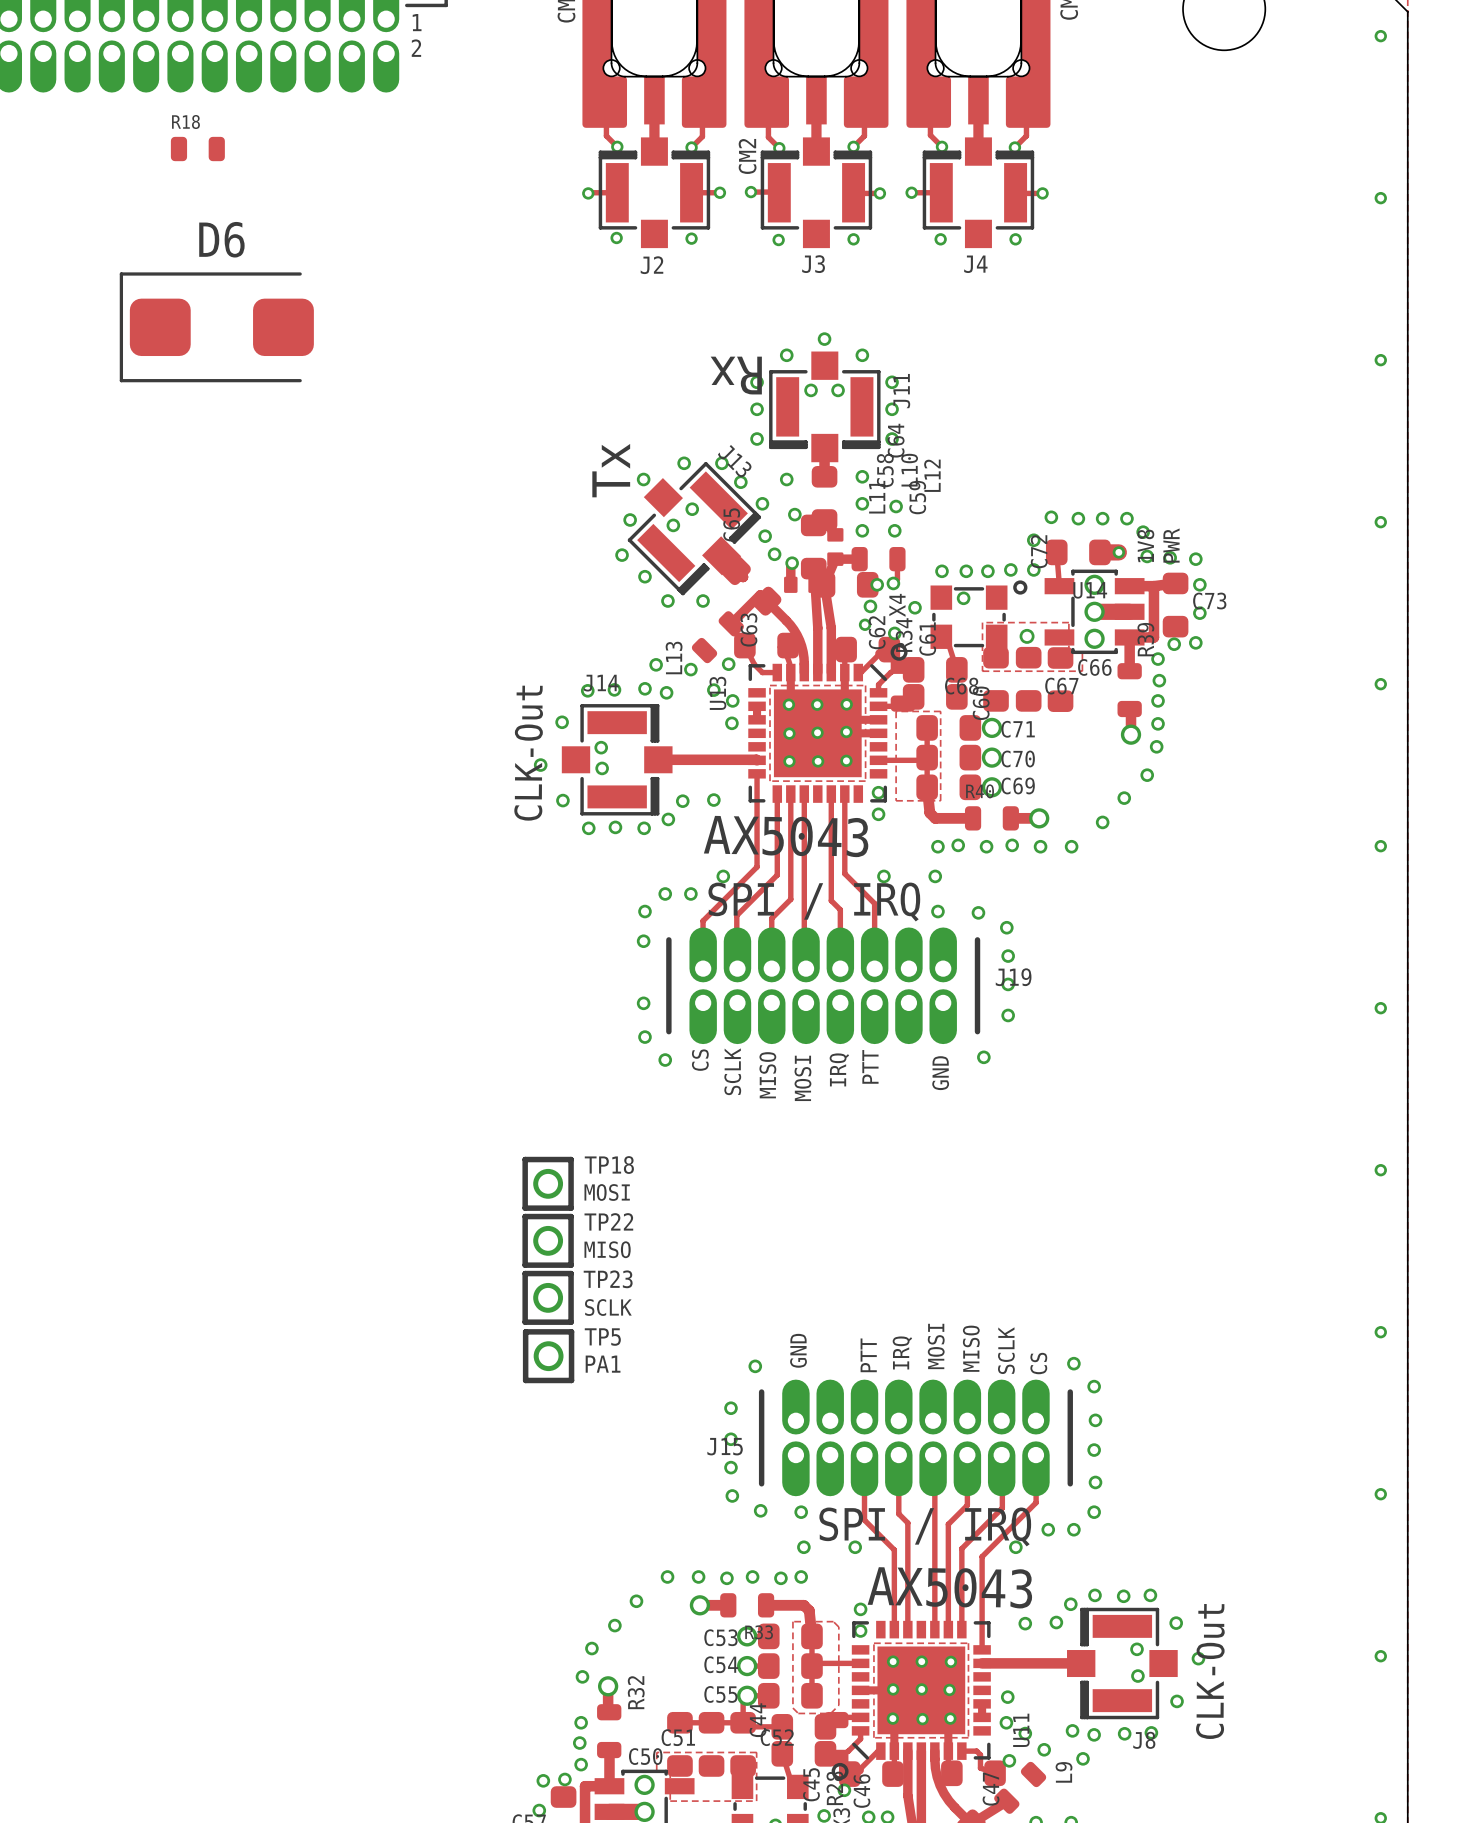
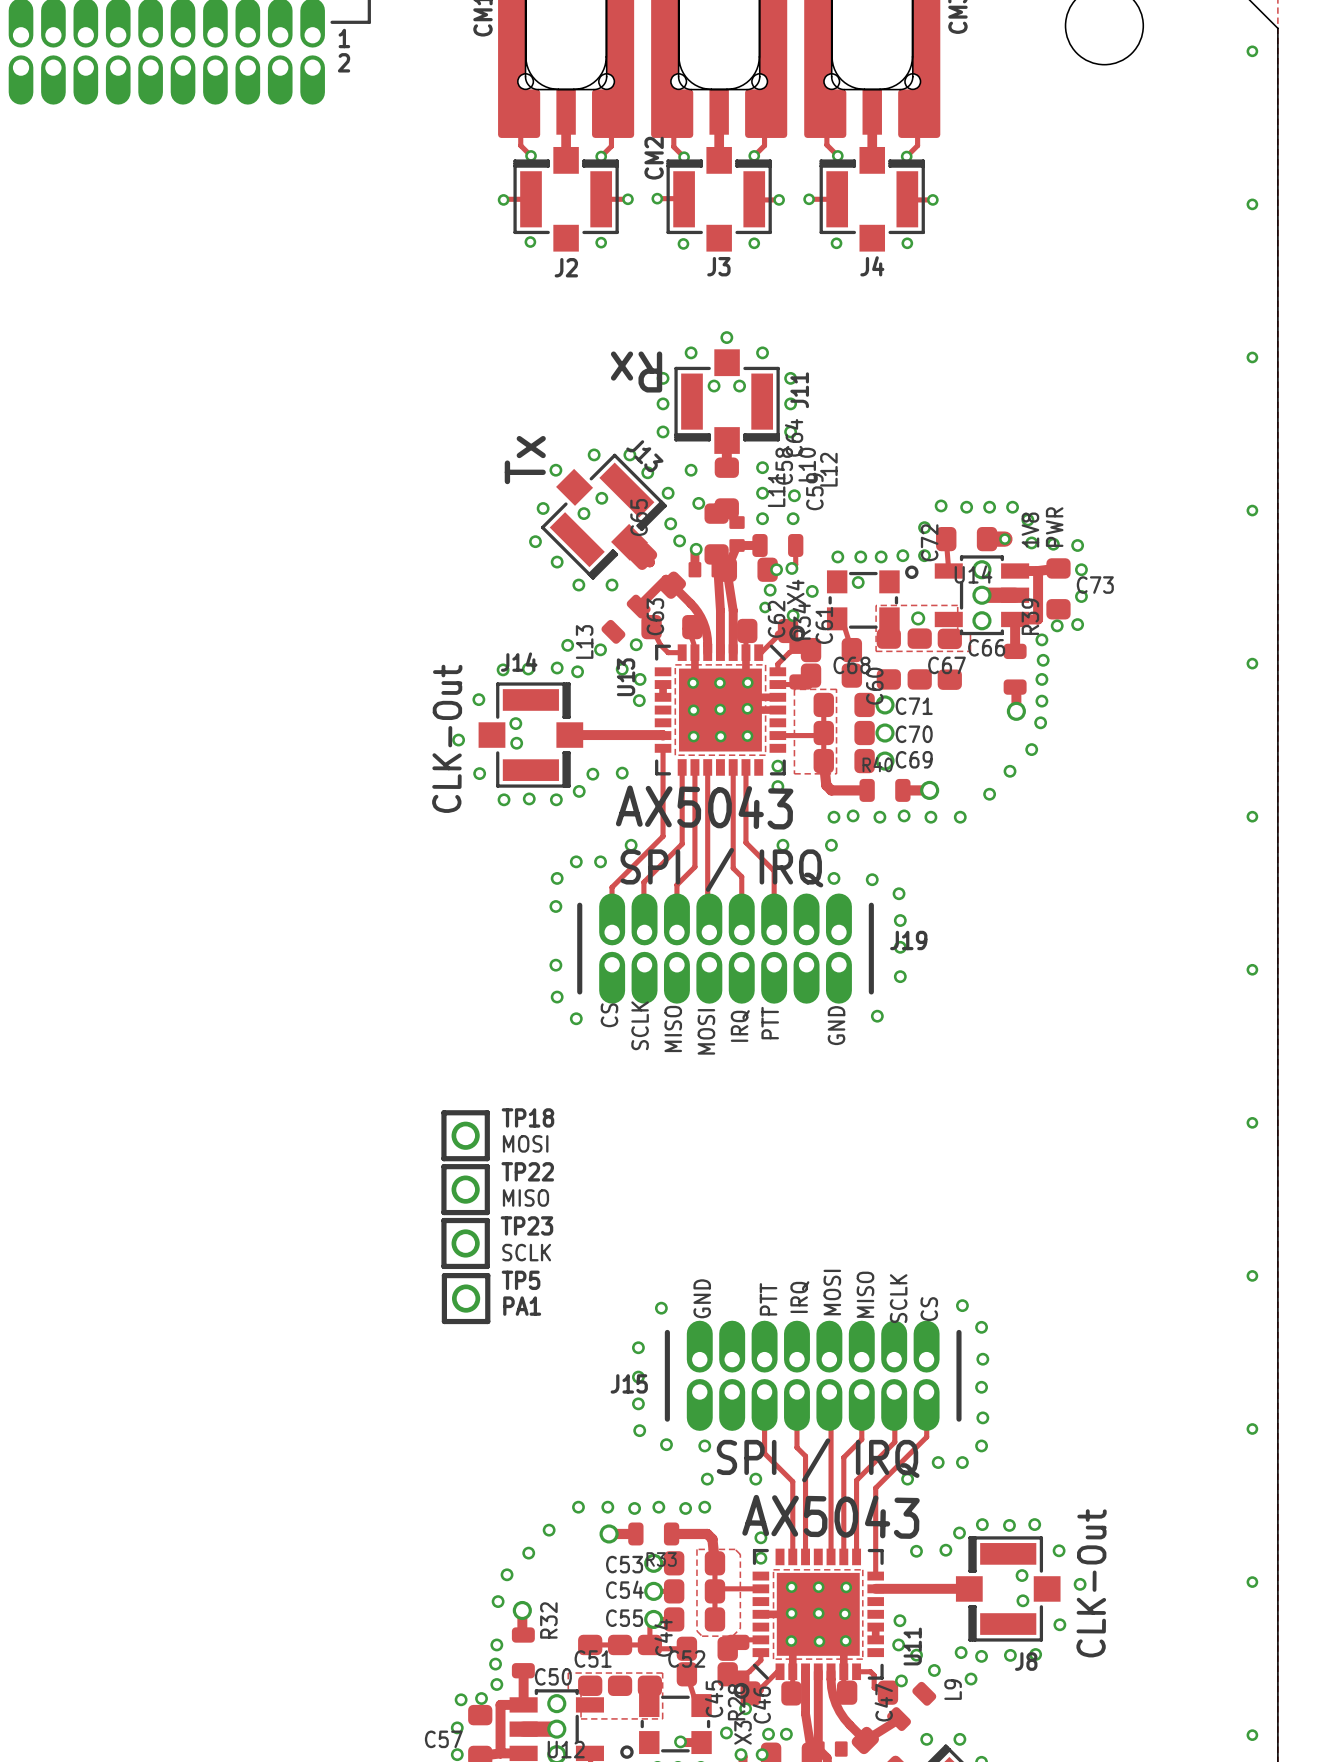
R18: (197, 149) -> none
D6: (216, 327) -> none

